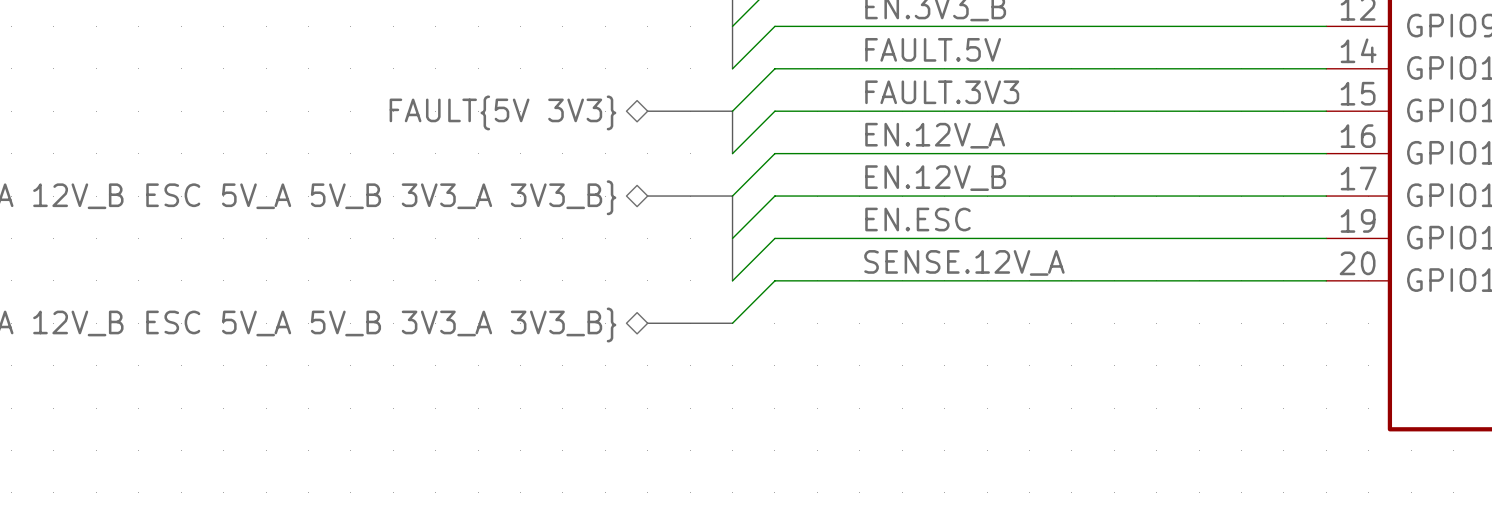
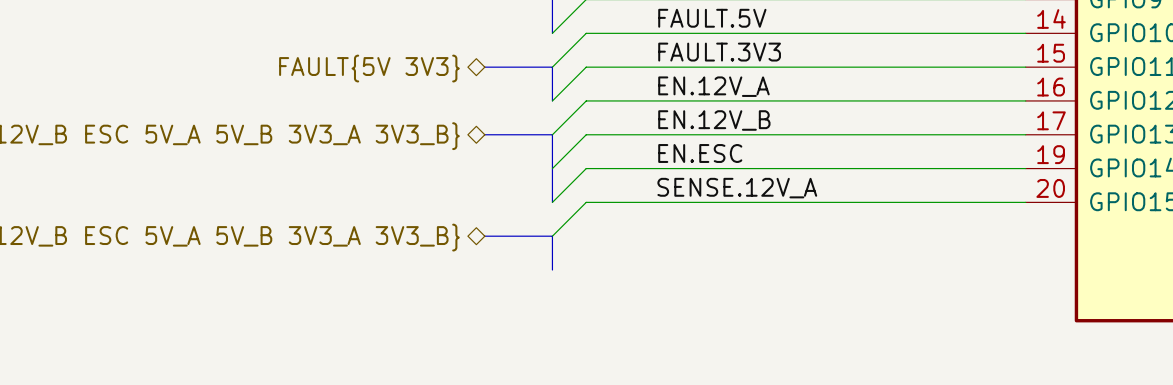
bus: none -> (552, 236) (552, 270)

